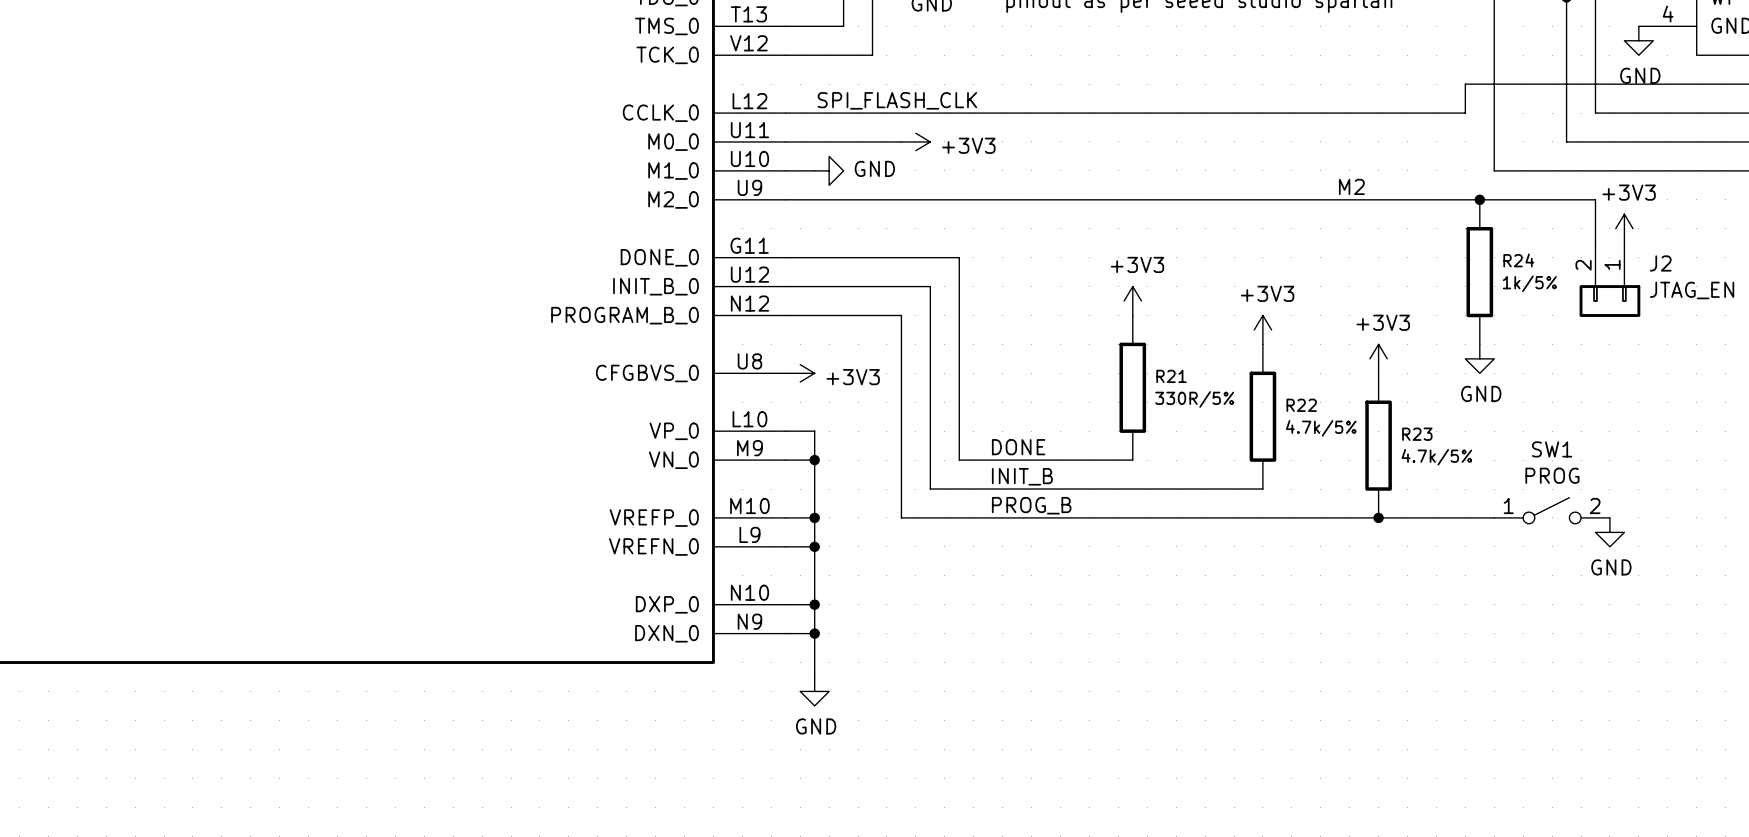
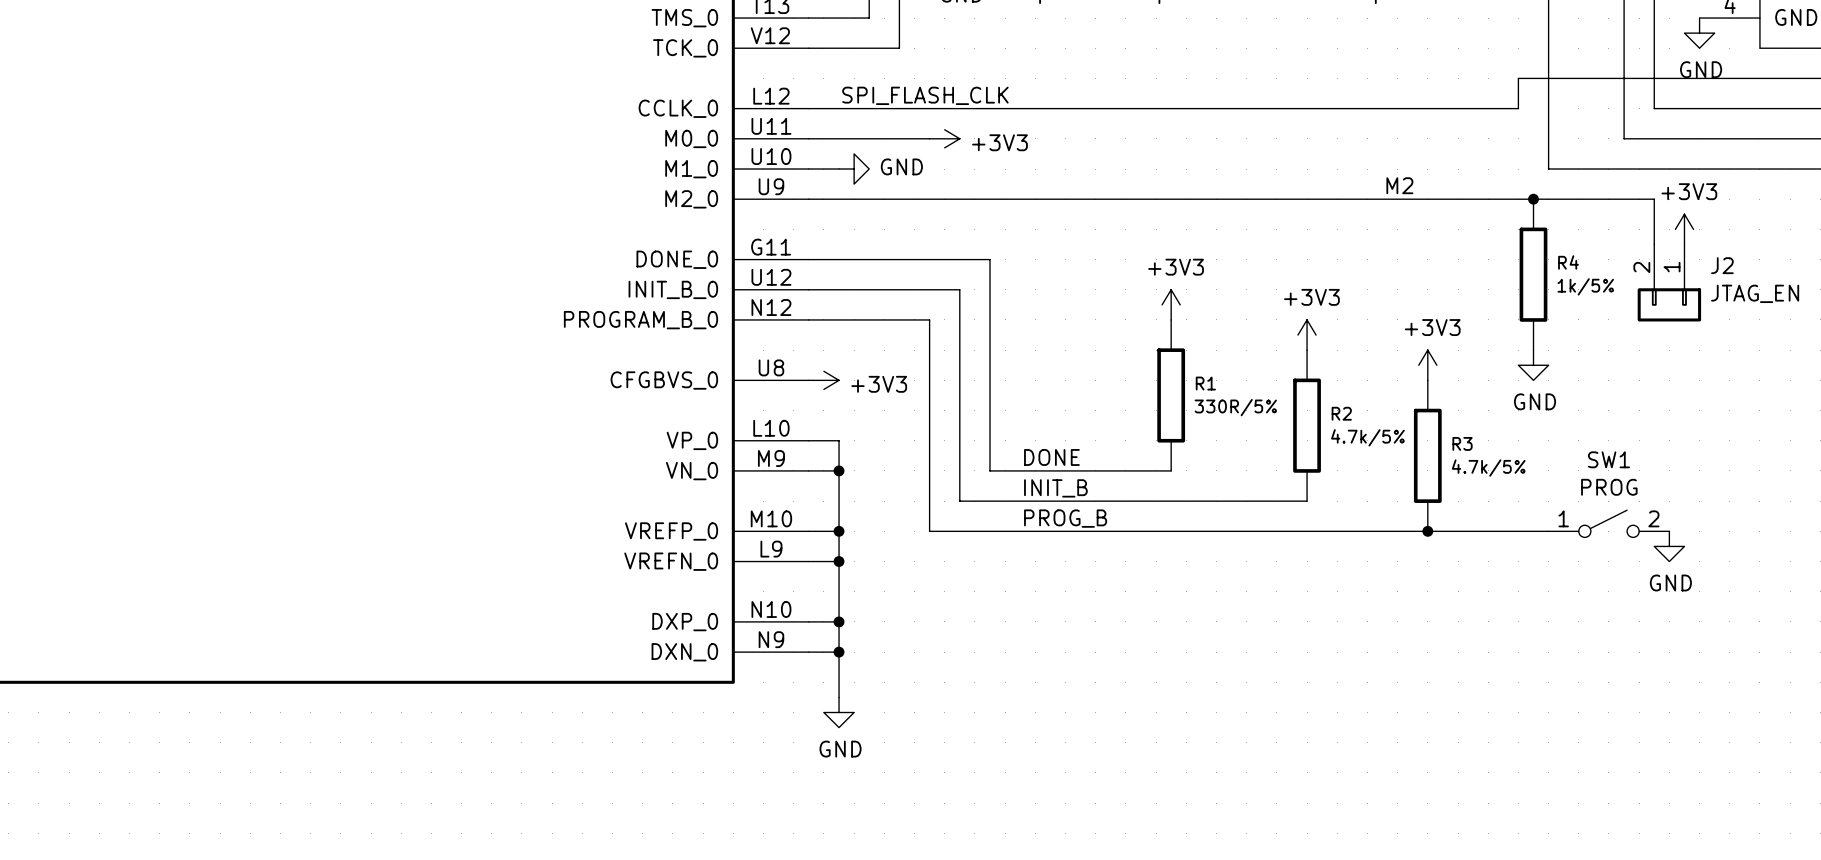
R24 name: R24 (1518, 260) -> R4 (1568, 262)
R21 name: R21 (1171, 376) -> R1 (1205, 383)
R22 name: R22 (1301, 405) -> R2 (1341, 413)
R23 name: R23 (1417, 434) -> R3 (1462, 443)

